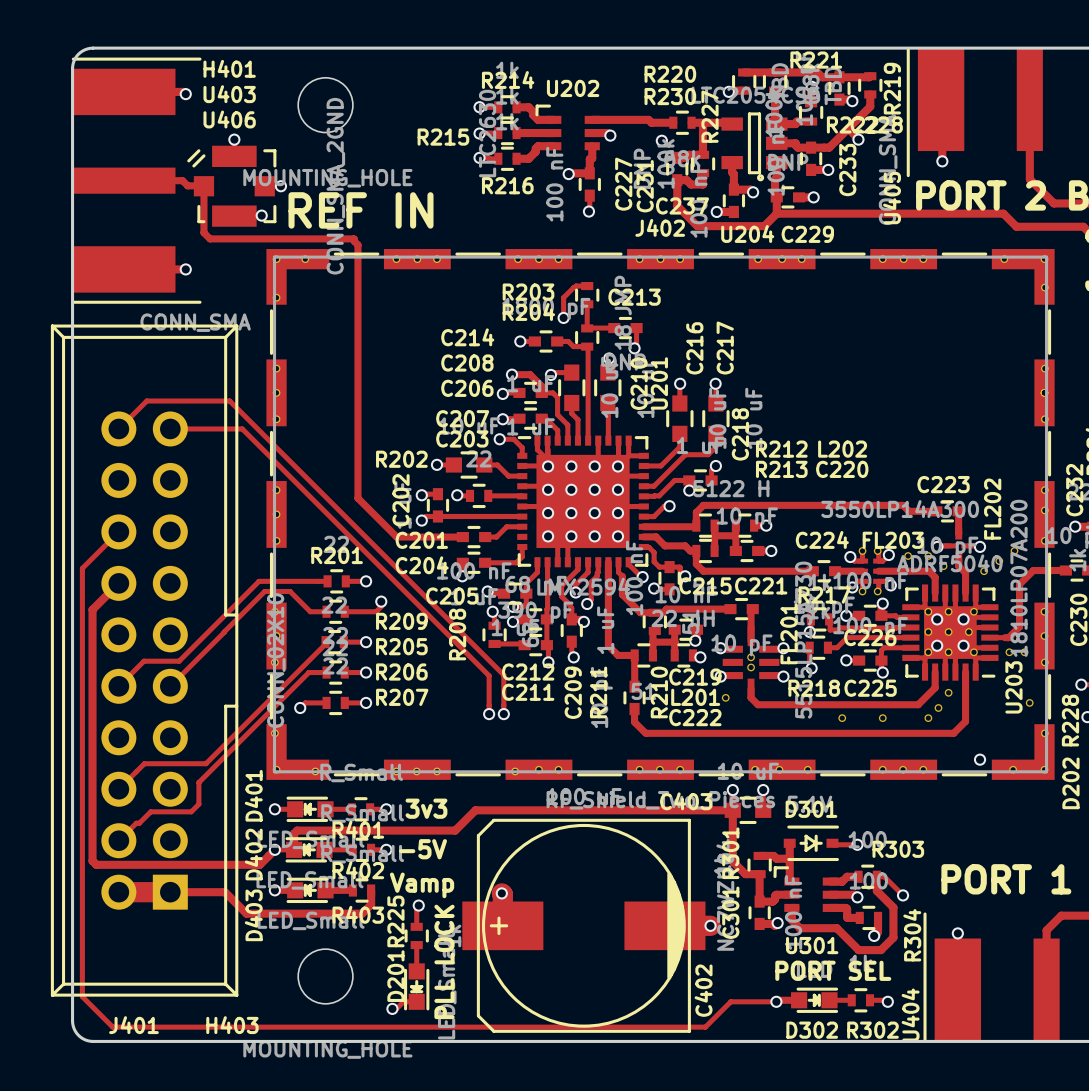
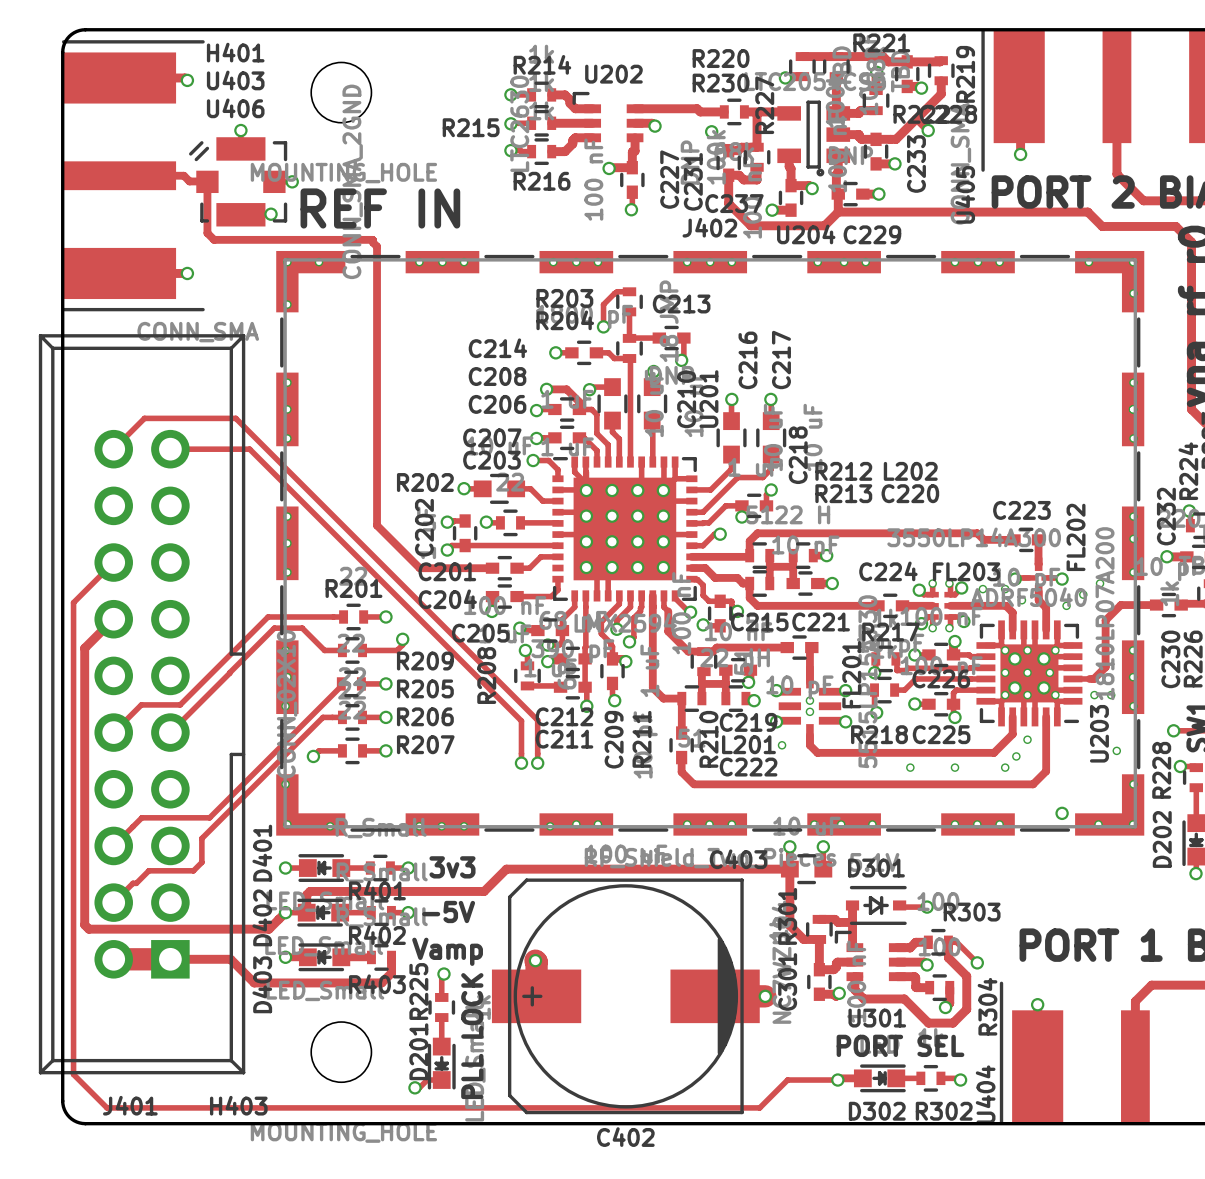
C402 name rotation: 0° (703, 990) -> 90° clockwise (625, 1137)
C402 name position: C402 (703, 990) -> C402 (625, 1137)

